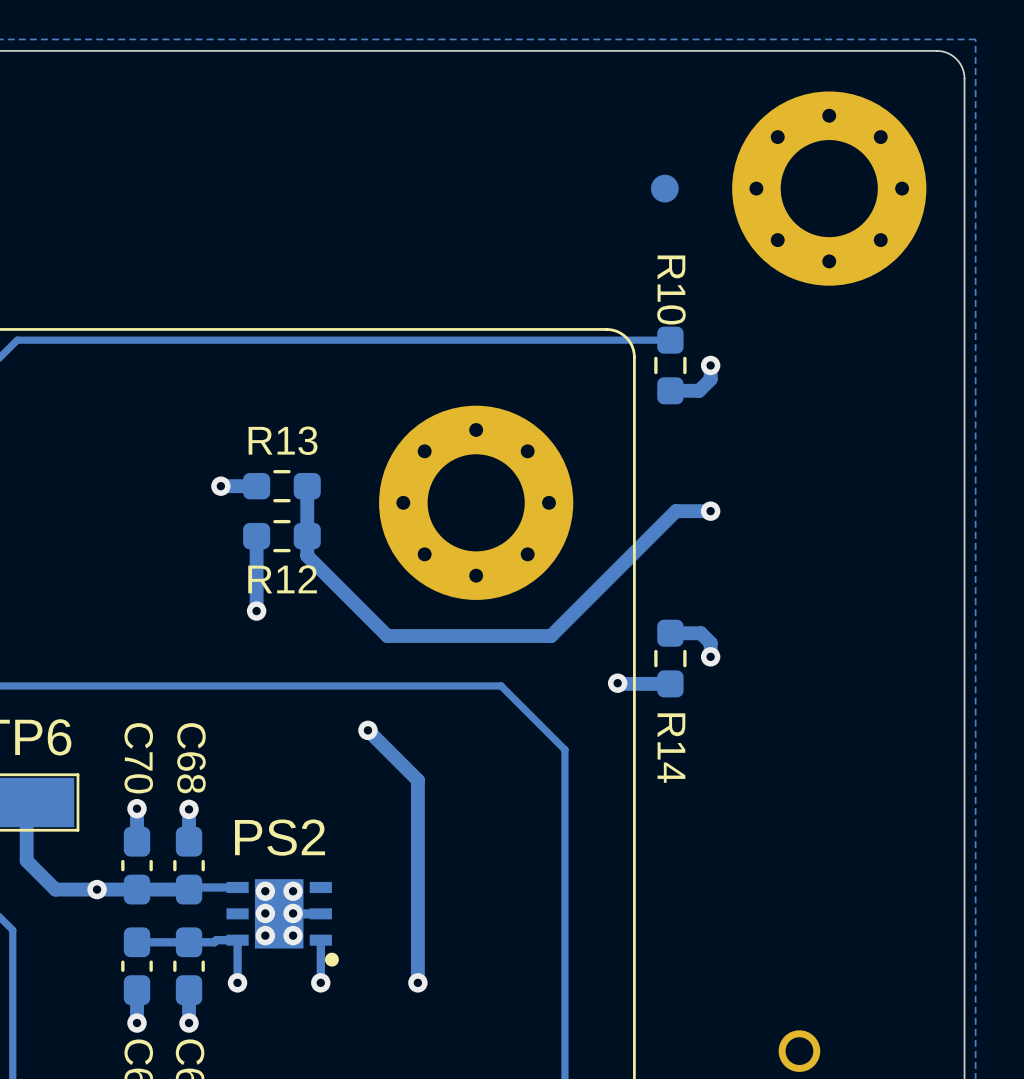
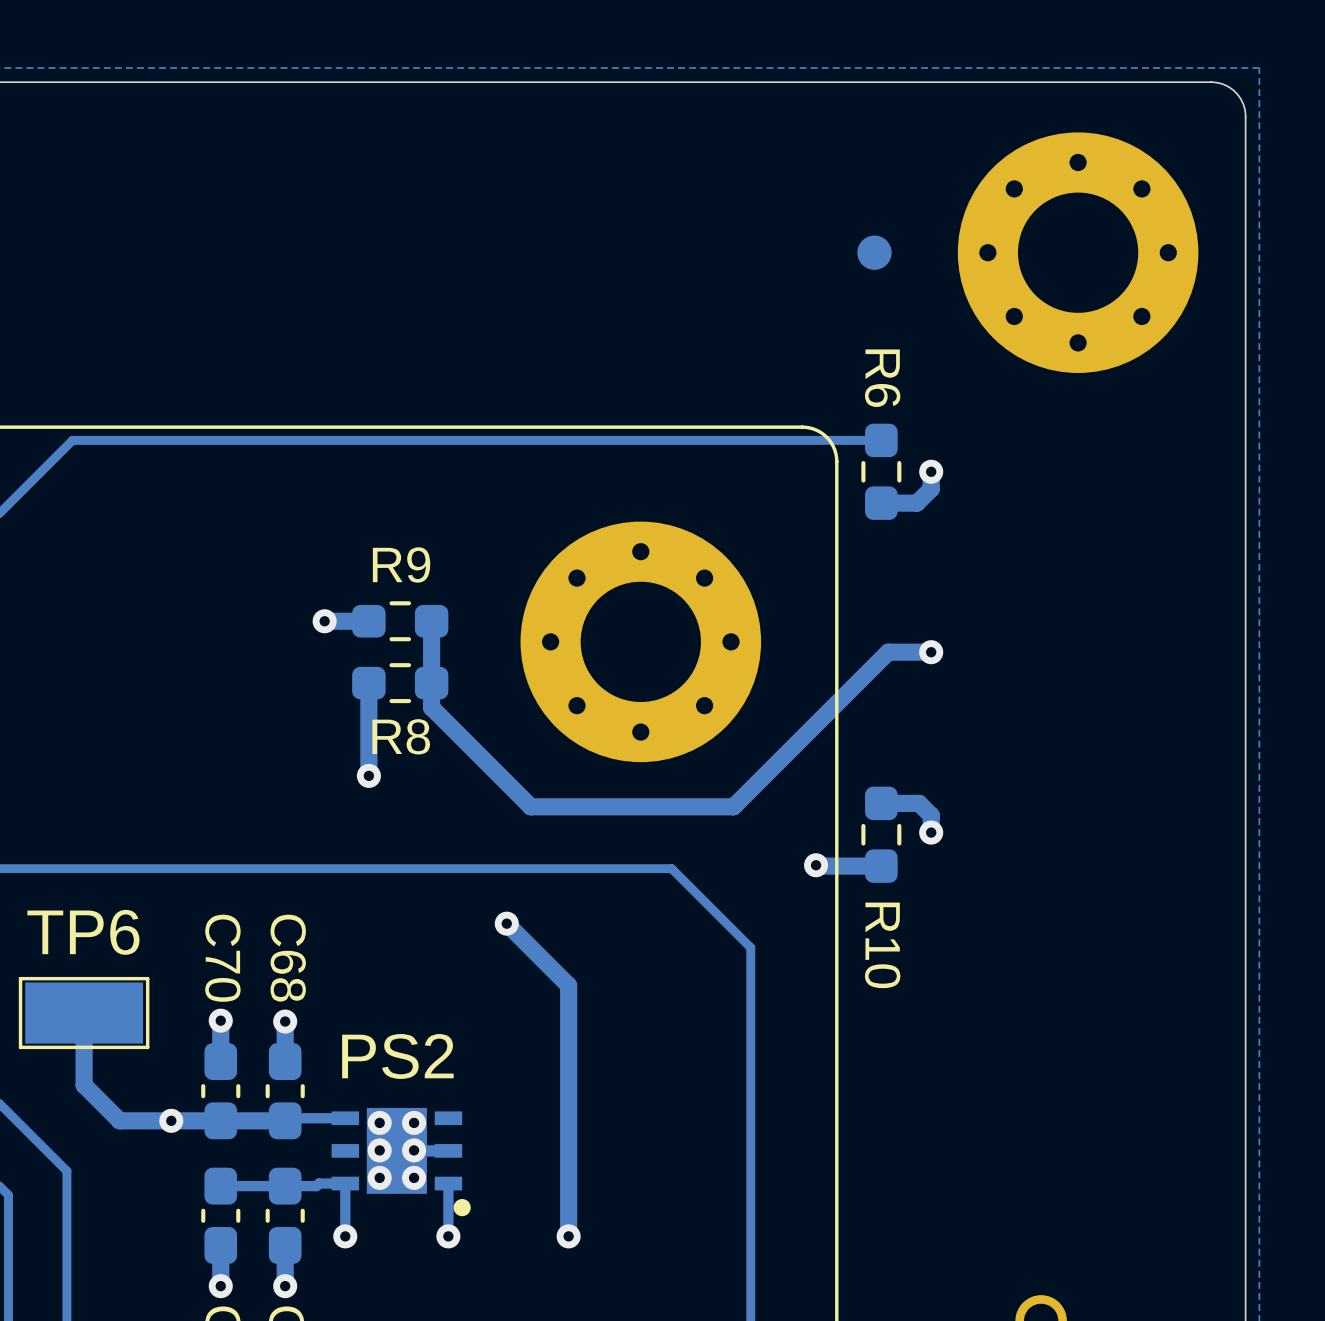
R10 name: R10 (671, 290) -> R6 (882, 378)
R13 name: R13 (283, 440) -> R9 (401, 564)
R12 name: R12 (282, 579) -> R8 (401, 736)
R14 name: R14 (671, 748) -> R10 (882, 945)

